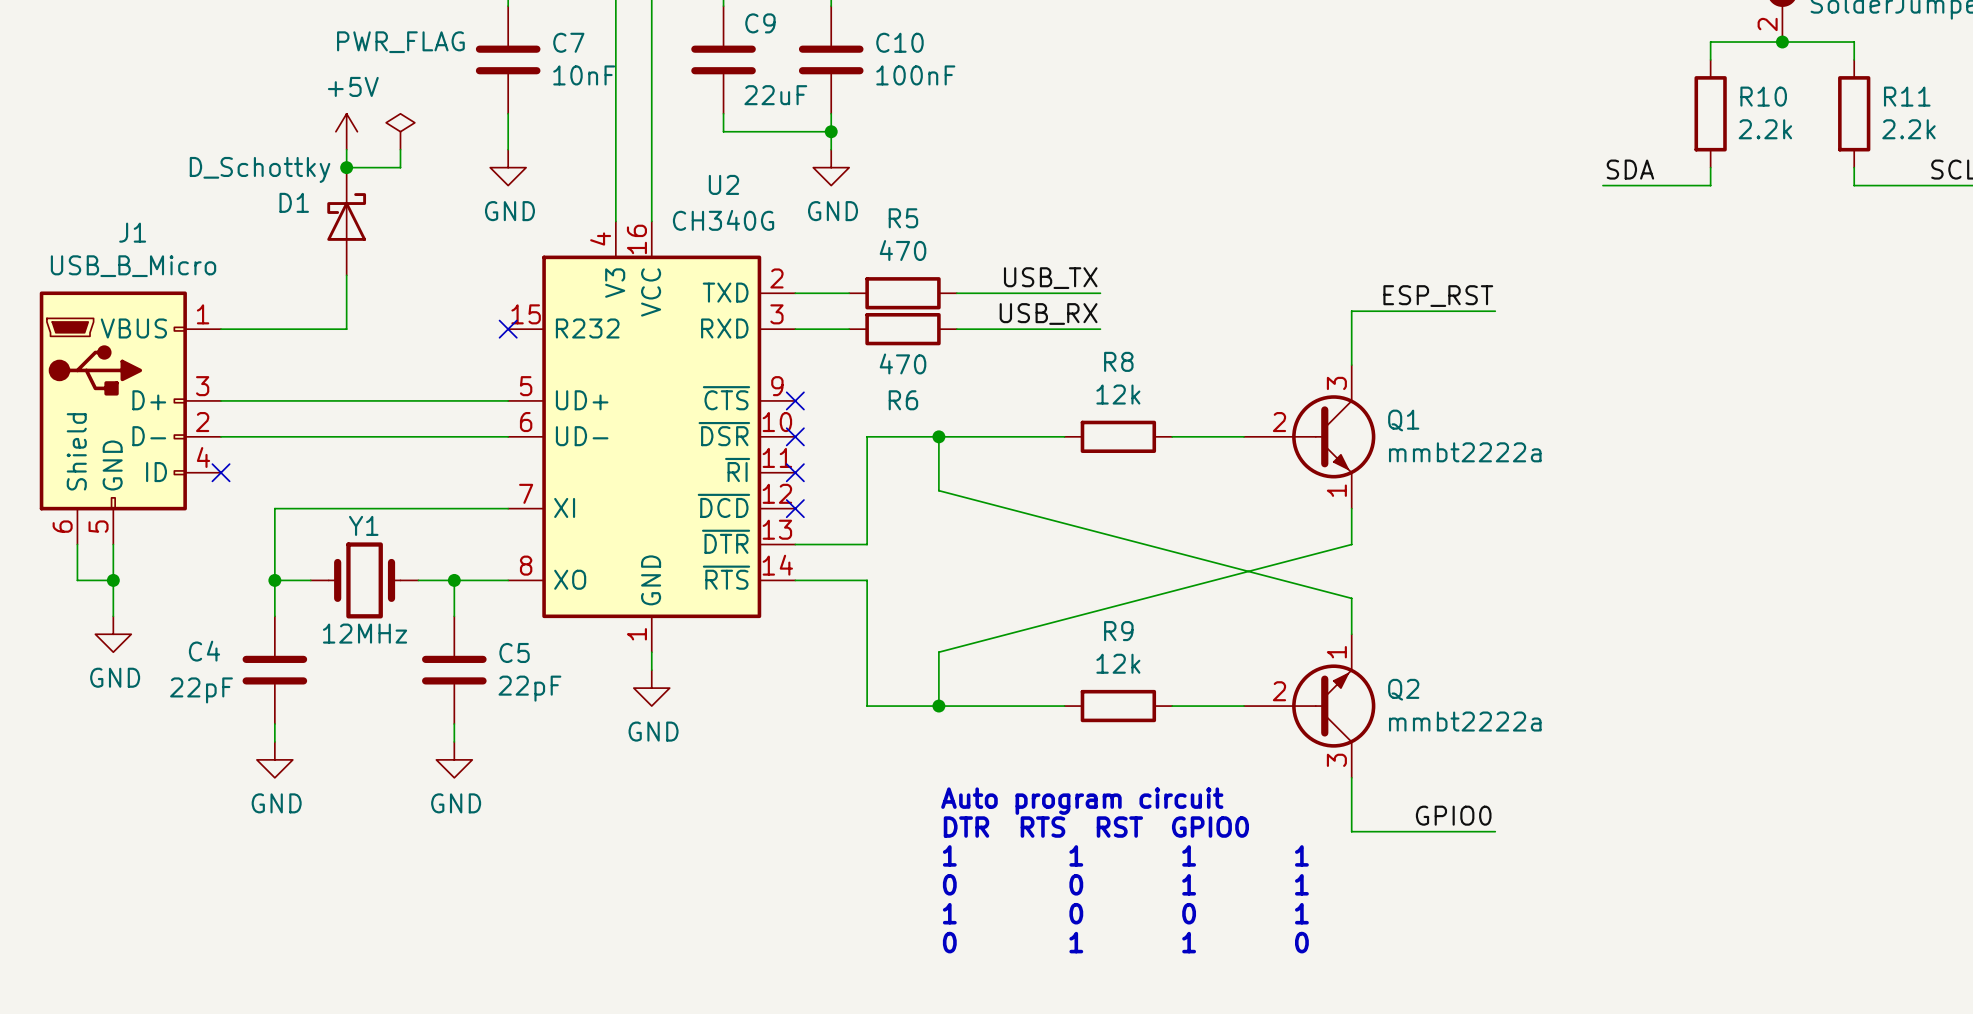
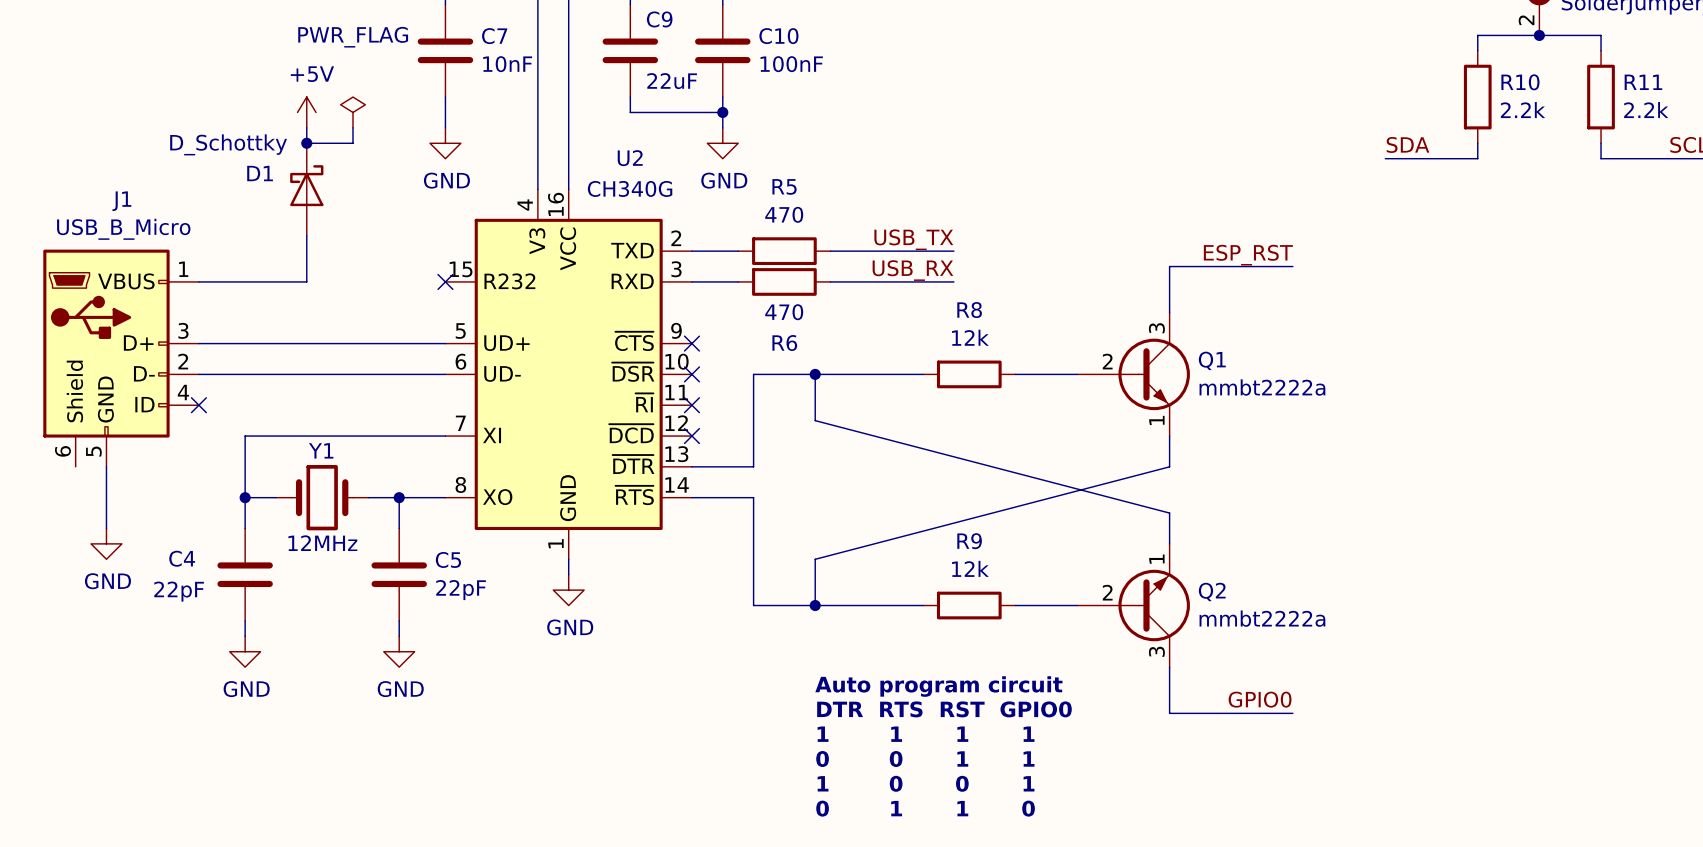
wire: (77, 544) (77, 580) (113, 580) -> none
junction: (113, 580) -> none

